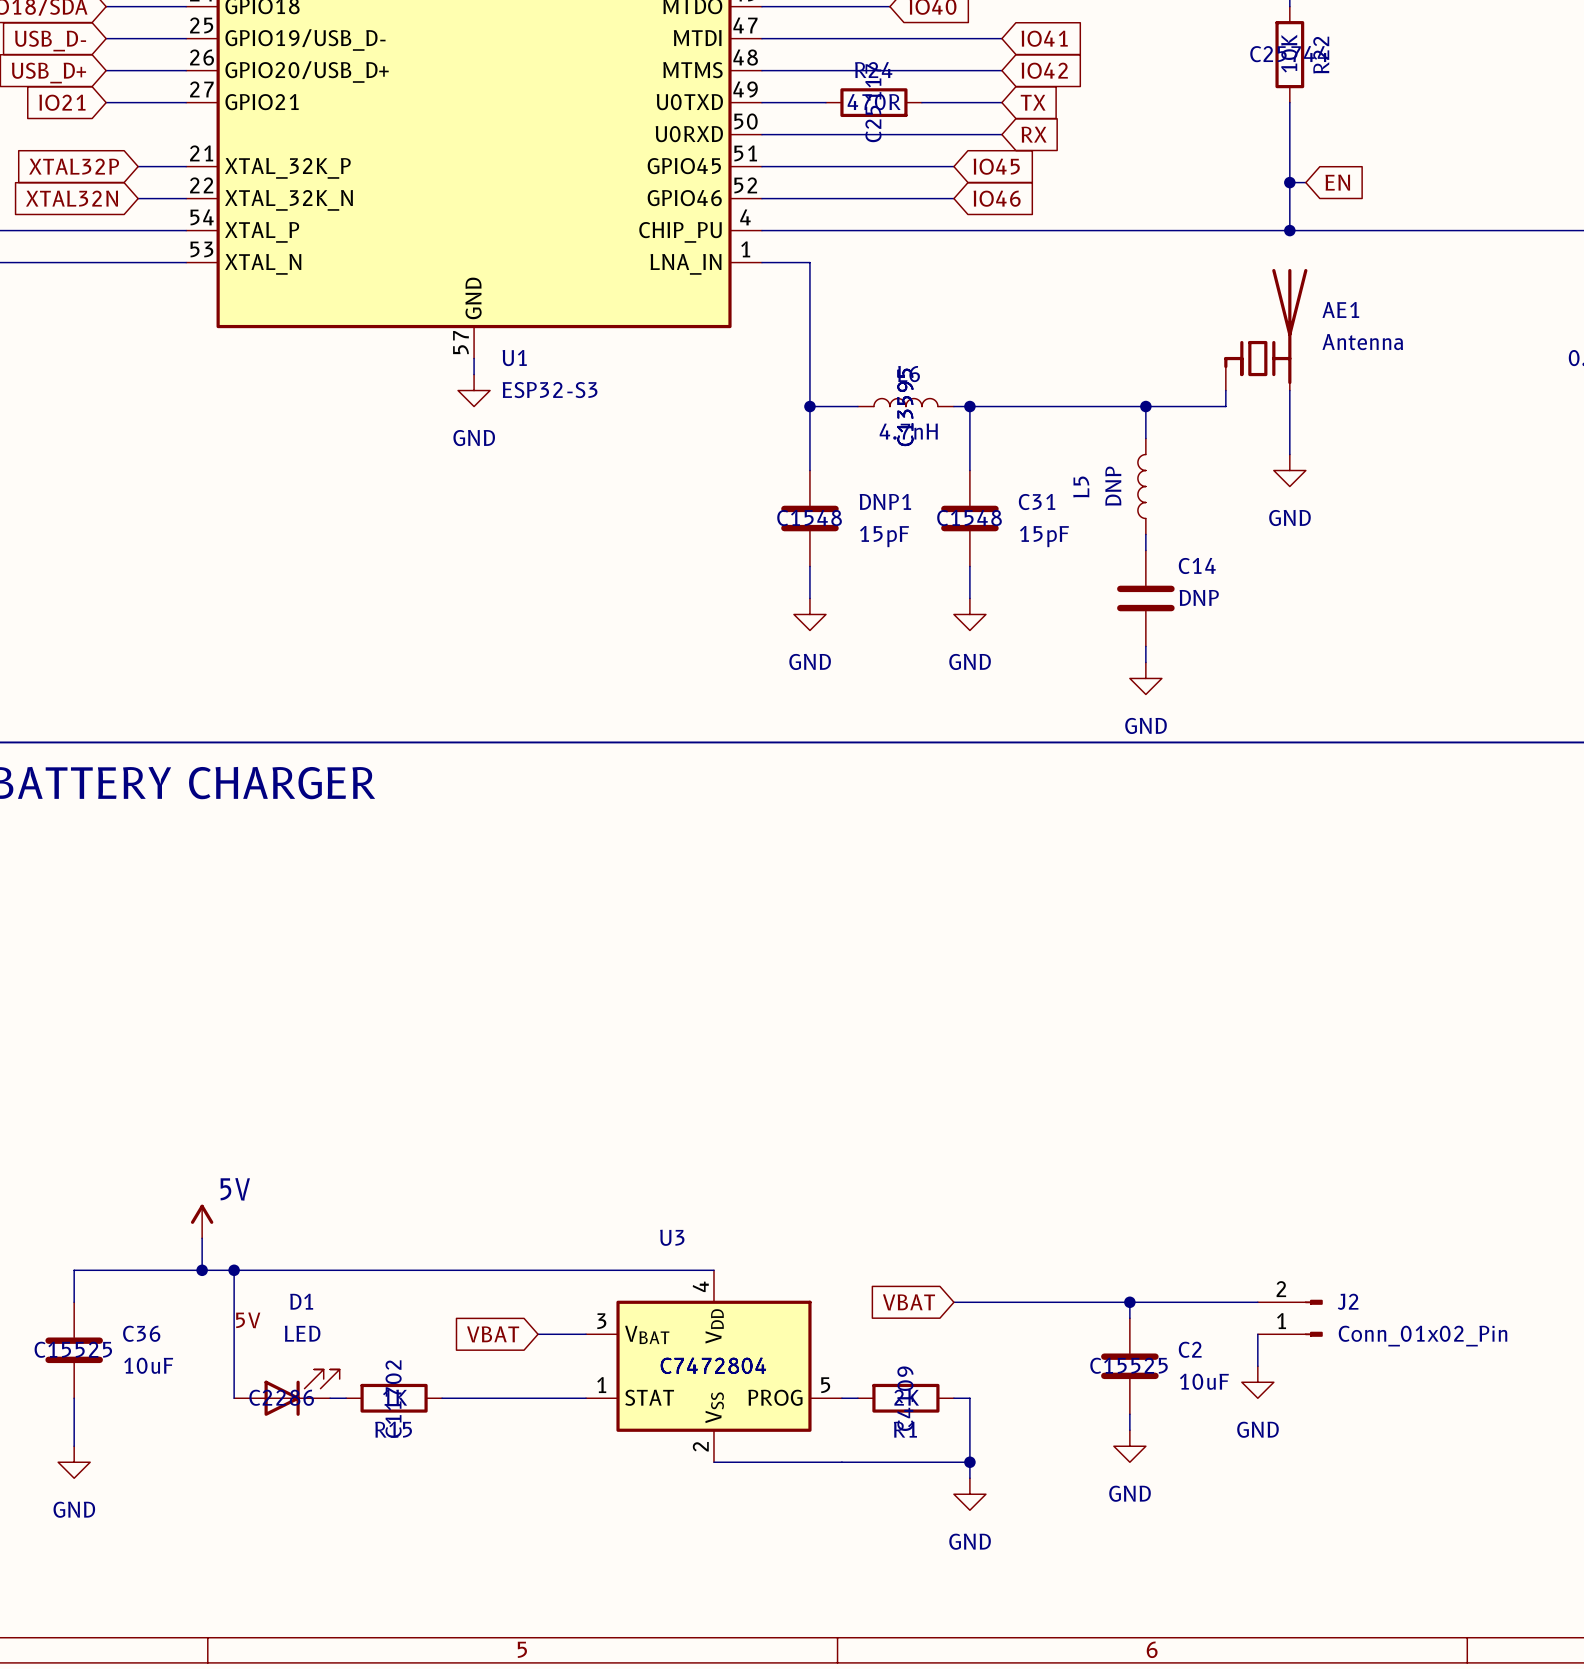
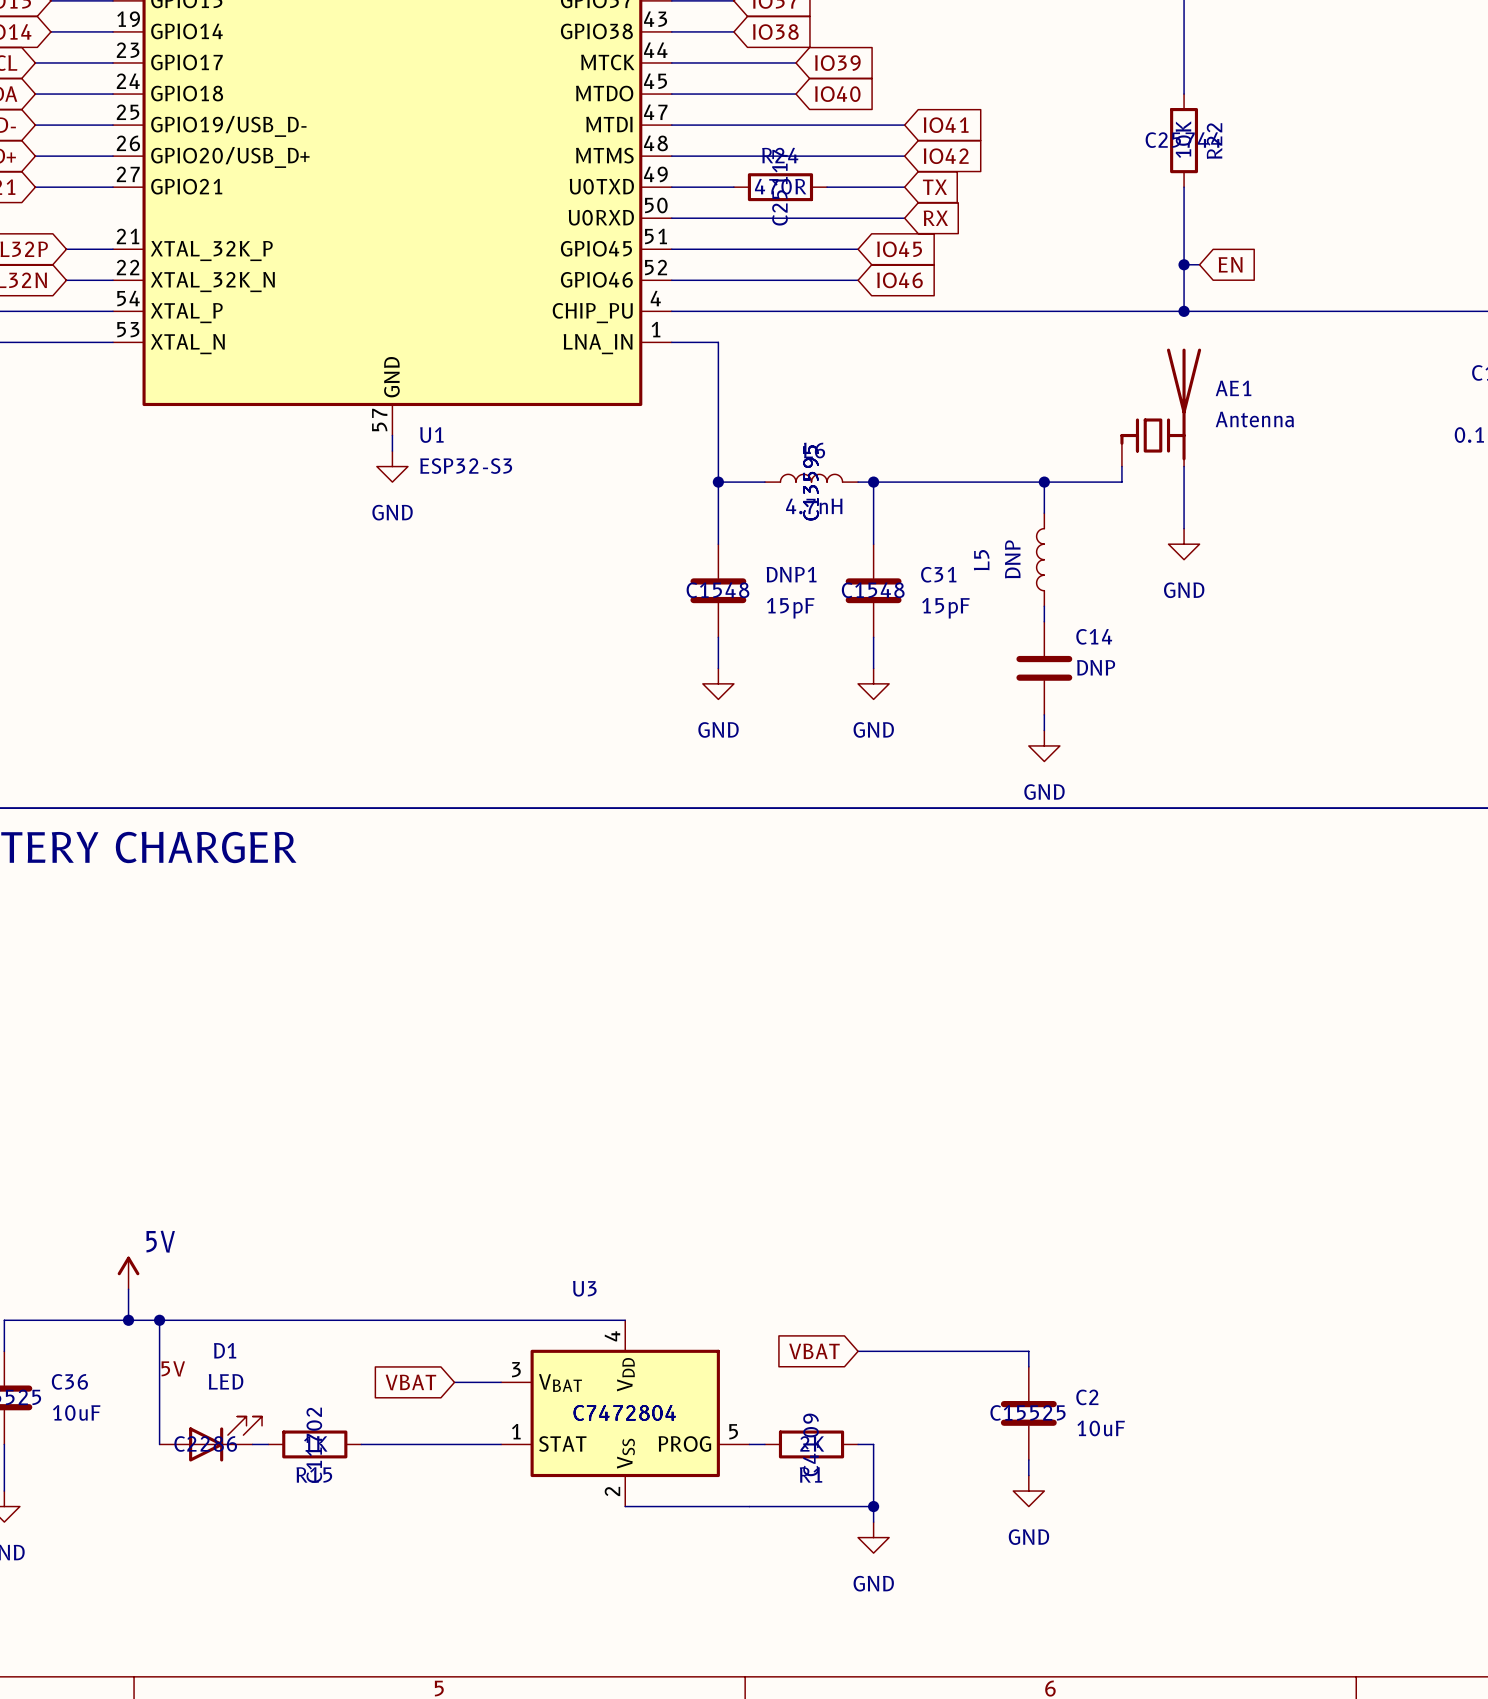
wire: (1129, 1302) (1257, 1302) -> none
junction: (1129, 1302) -> none
J2: Conn_01x02_Pin (1290, 1318) -> none
wire: (1257, 1334) (1257, 1366) -> none
power symbol: GND (1257, 1382) -> none

